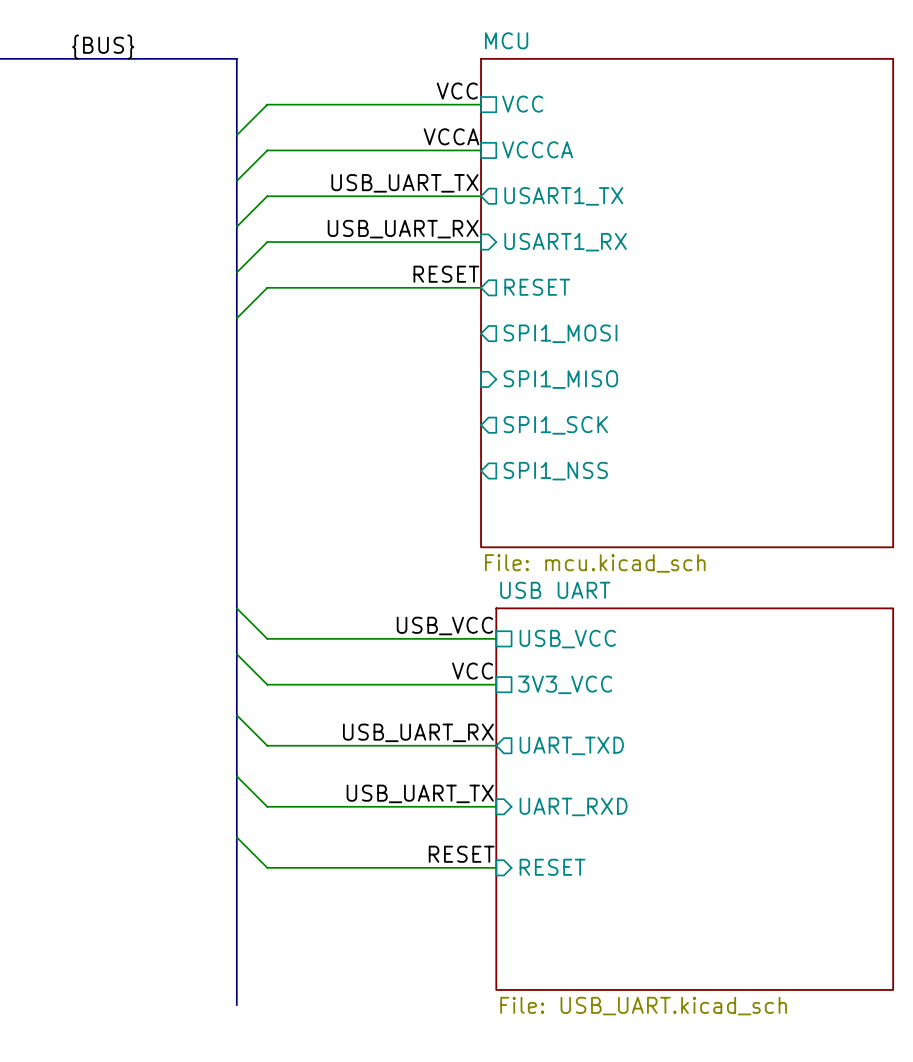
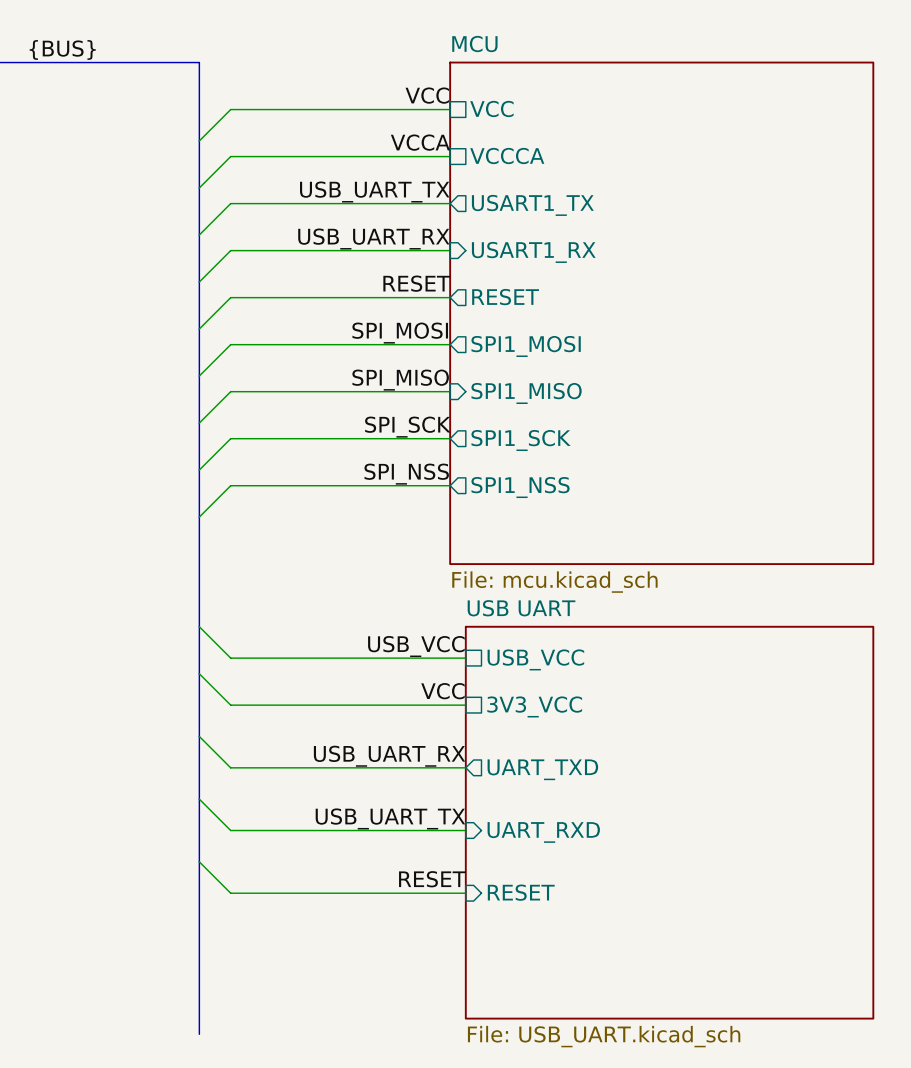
label: none -> SPI_MOSI (400, 333)
wire: none -> (450, 344) (230, 344) (199, 376)
label: none -> SPI_MISO (400, 380)
wire: none -> (450, 391) (230, 391) (199, 423)
label: none -> SPI_SCK (407, 427)
wire: none -> (450, 438) (230, 438) (199, 470)
label: none -> SPI_NSS (406, 474)
wire: none -> (450, 485) (230, 485) (199, 517)

